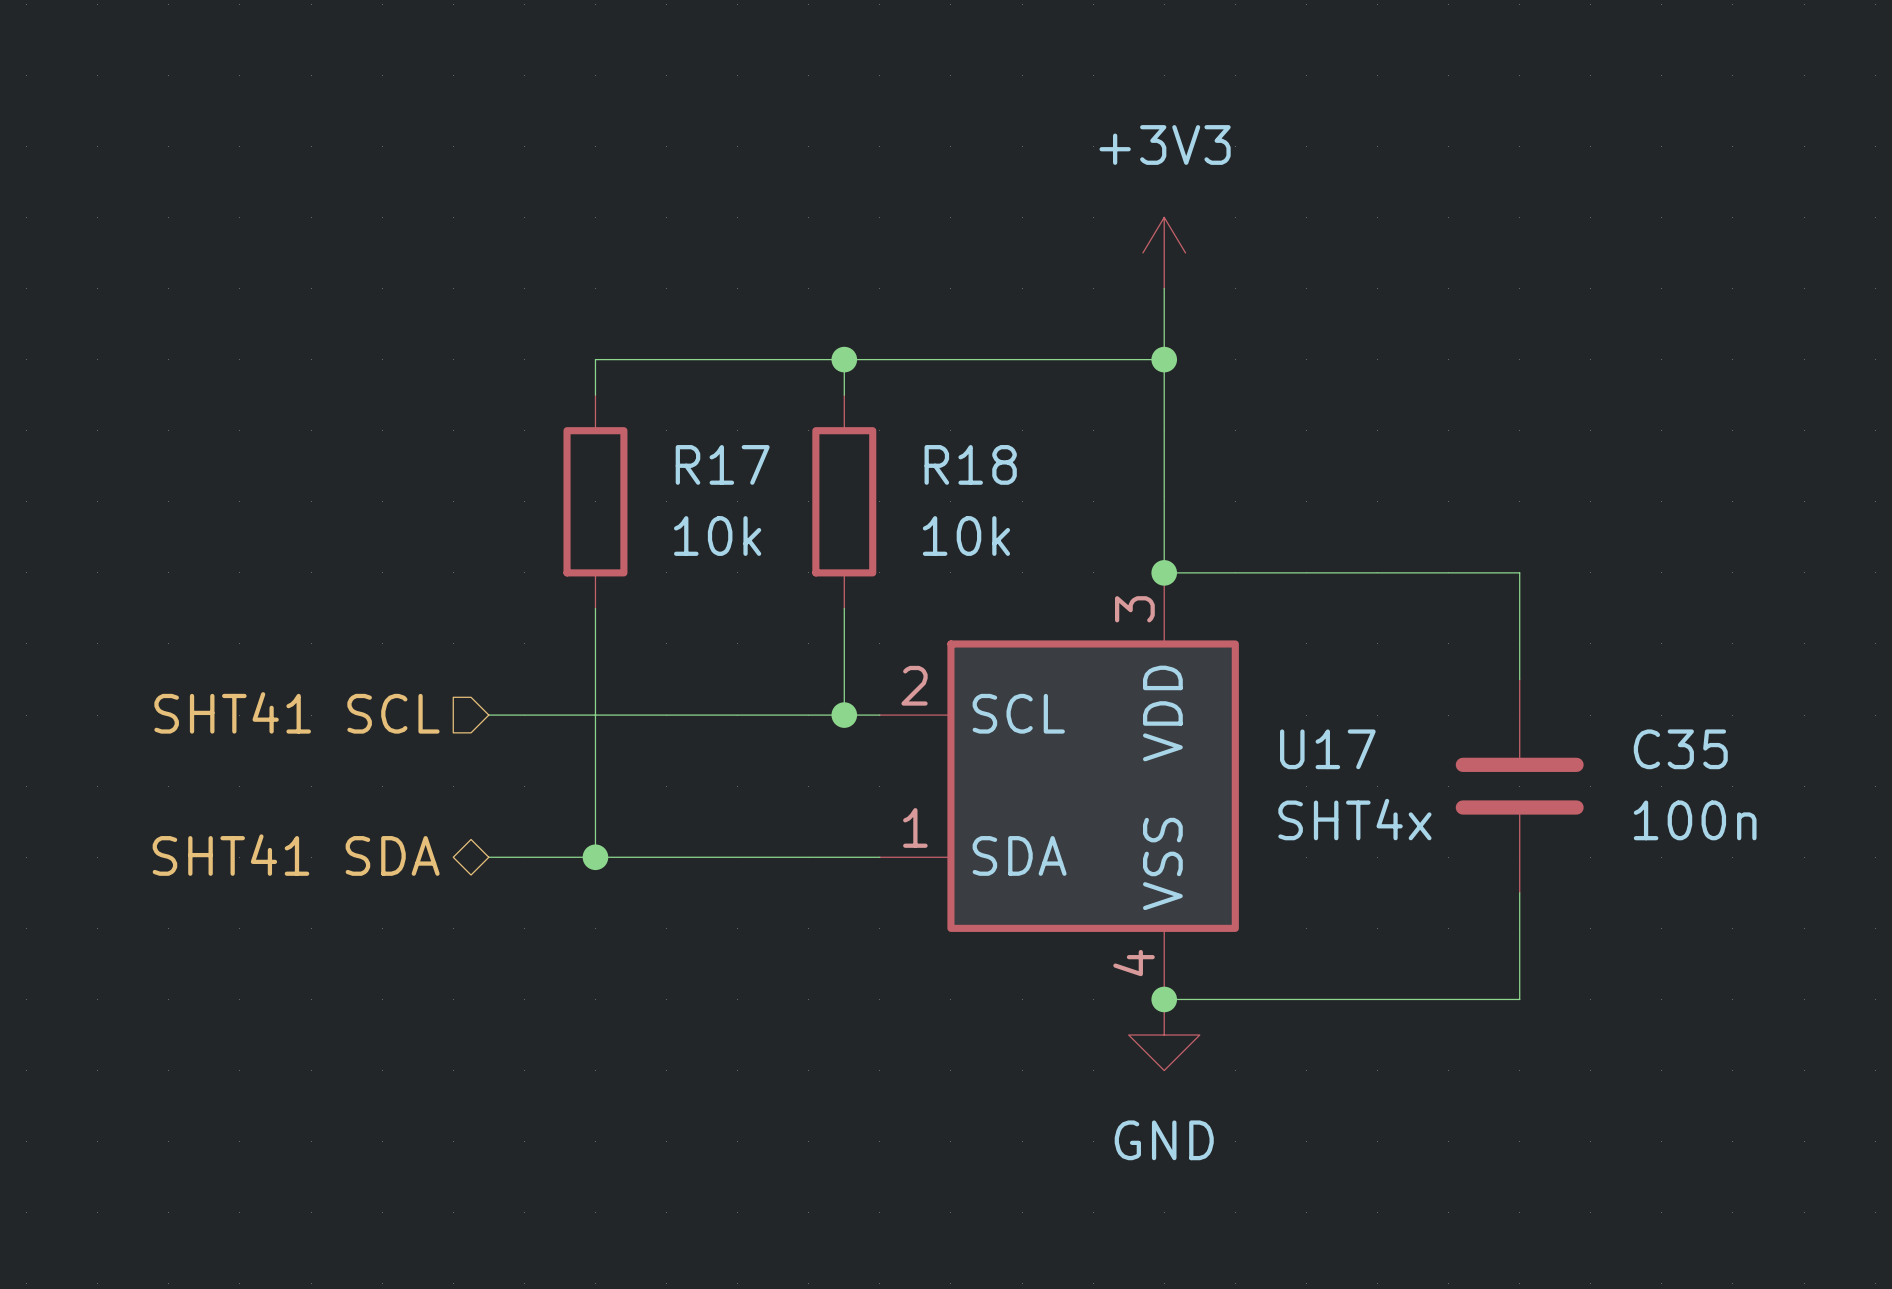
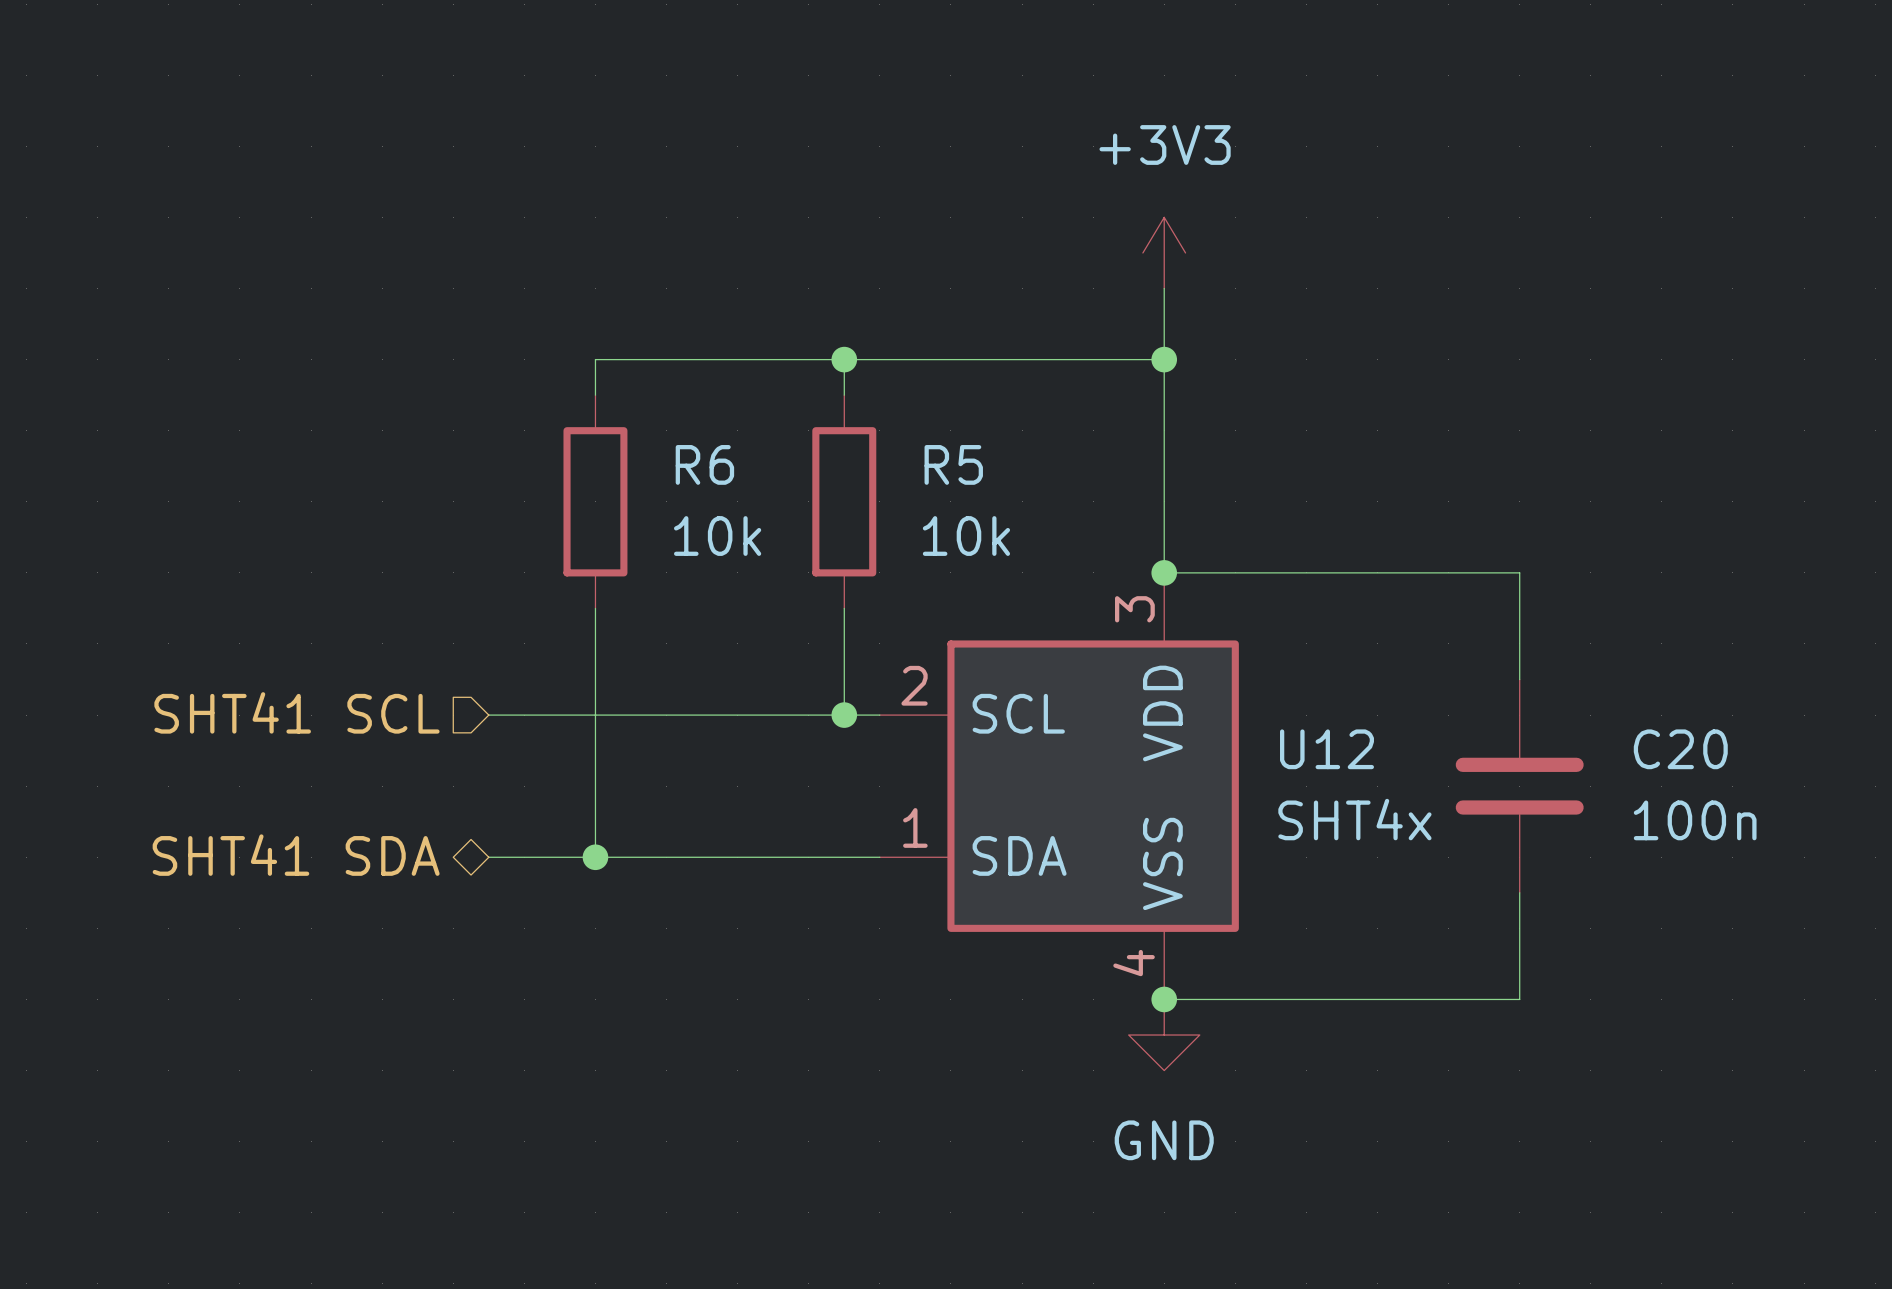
R17 name: R17 (722, 464) -> R6 (704, 464)
R18 name: R18 (970, 464) -> R5 (953, 464)
U17 name: U17 (1327, 749) -> U12 (1326, 749)
C35 name: C35 (1680, 749) -> C20 (1680, 749)

